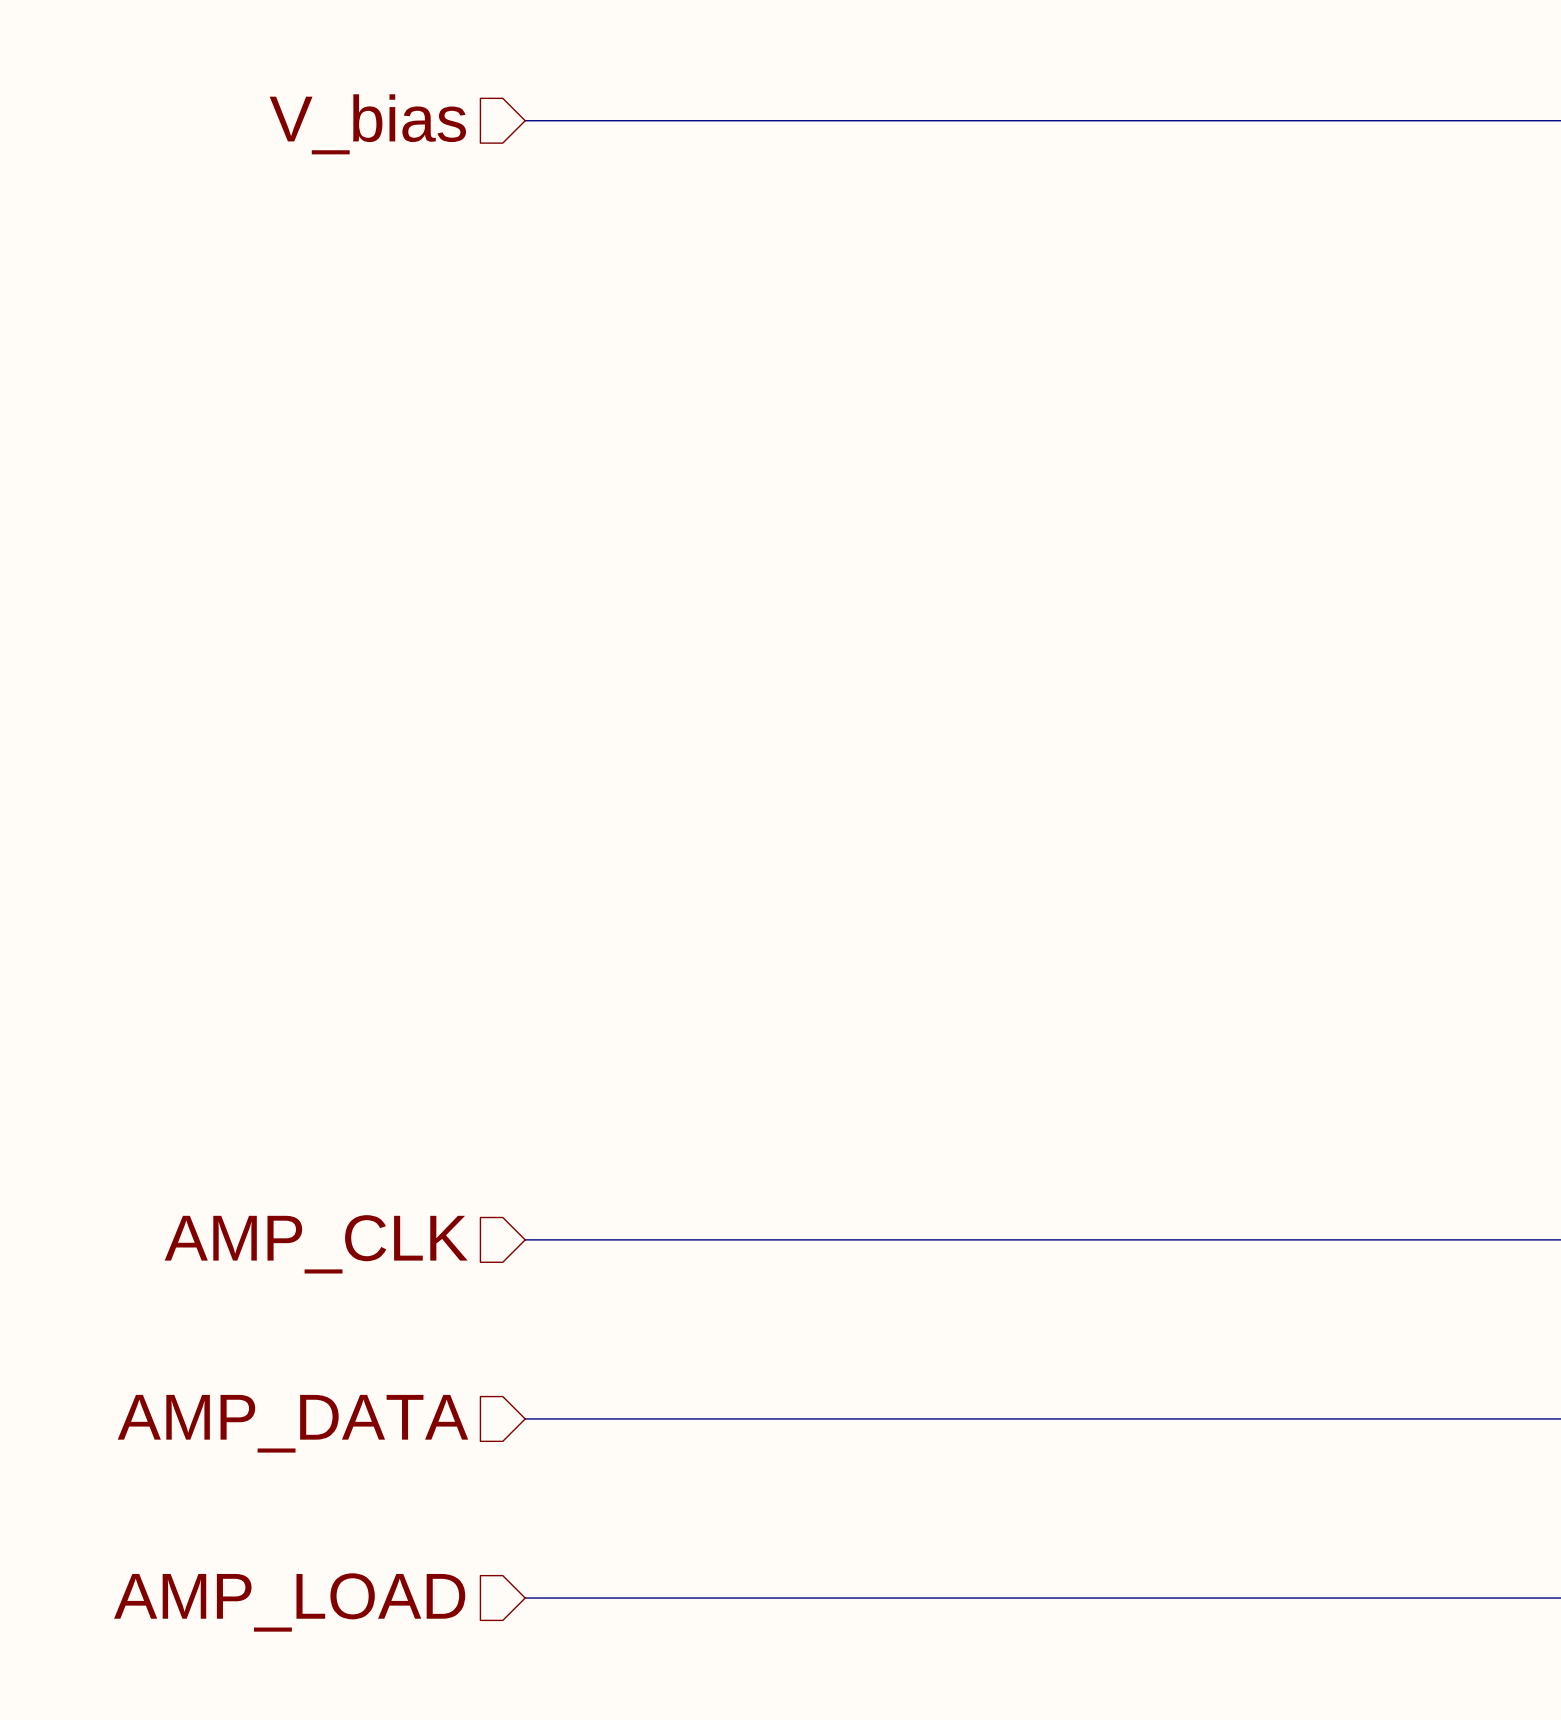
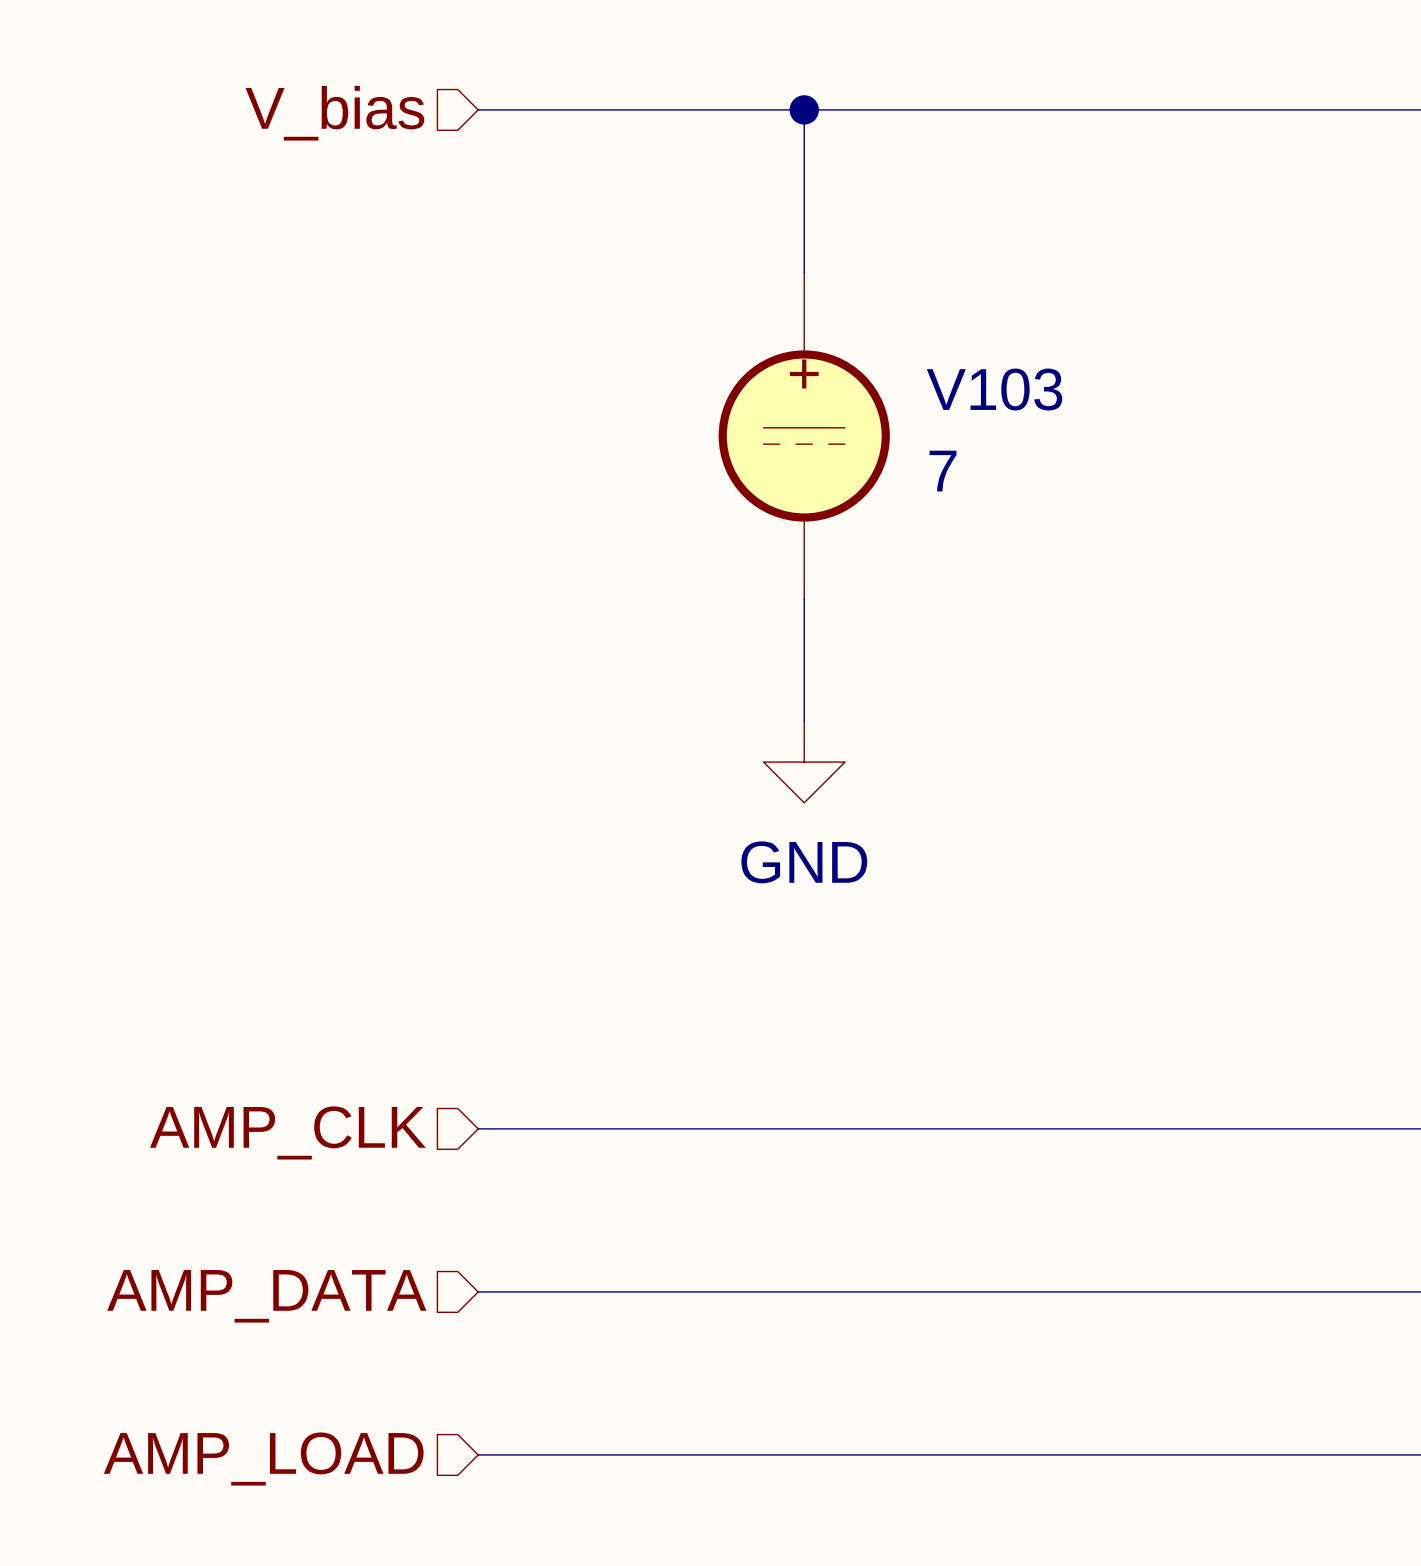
wire: none -> (804, 109) (804, 272)
junction: none -> (804, 109)
V103: none -> 7 (804, 435)
wire: none -> (804, 599) (804, 721)
power symbol: none -> GND (804, 762)

